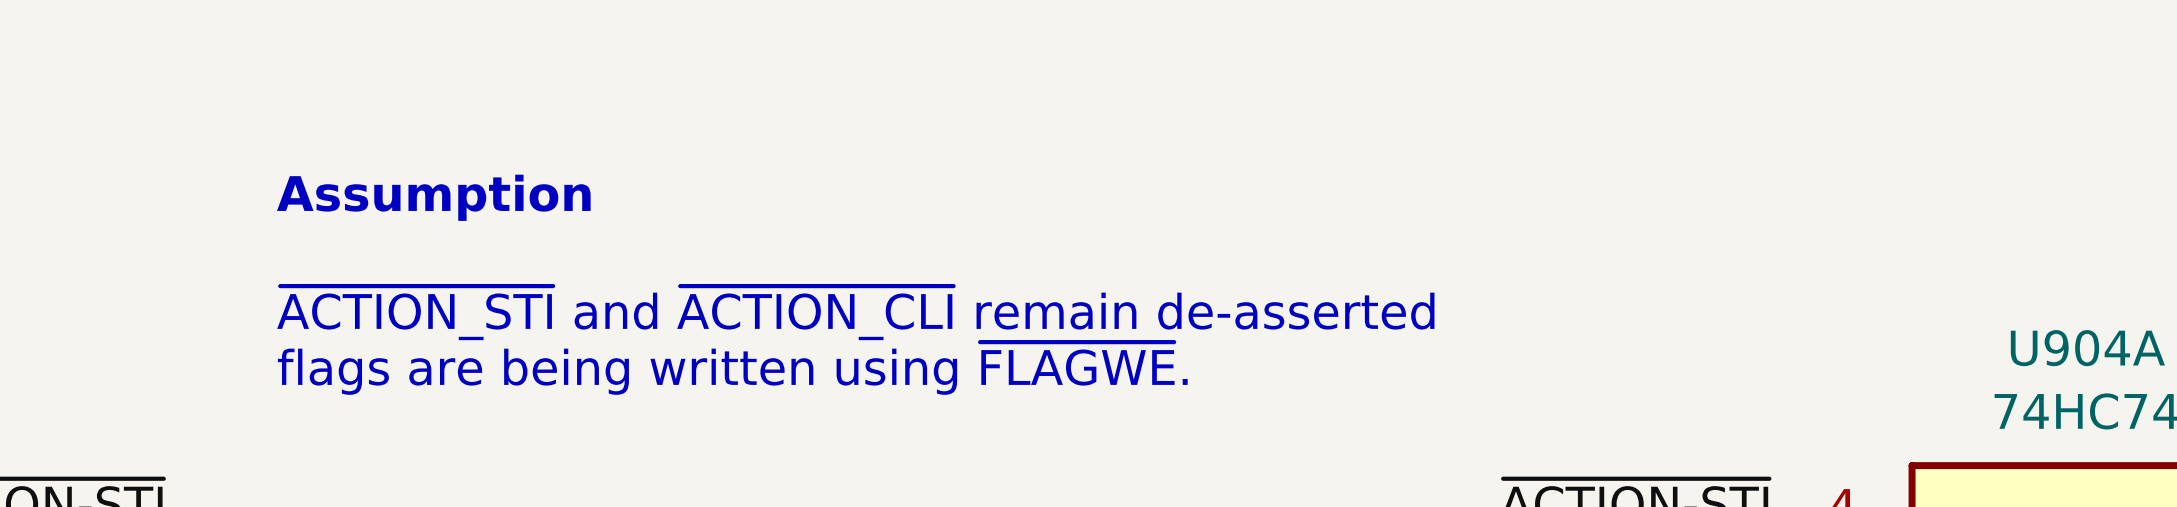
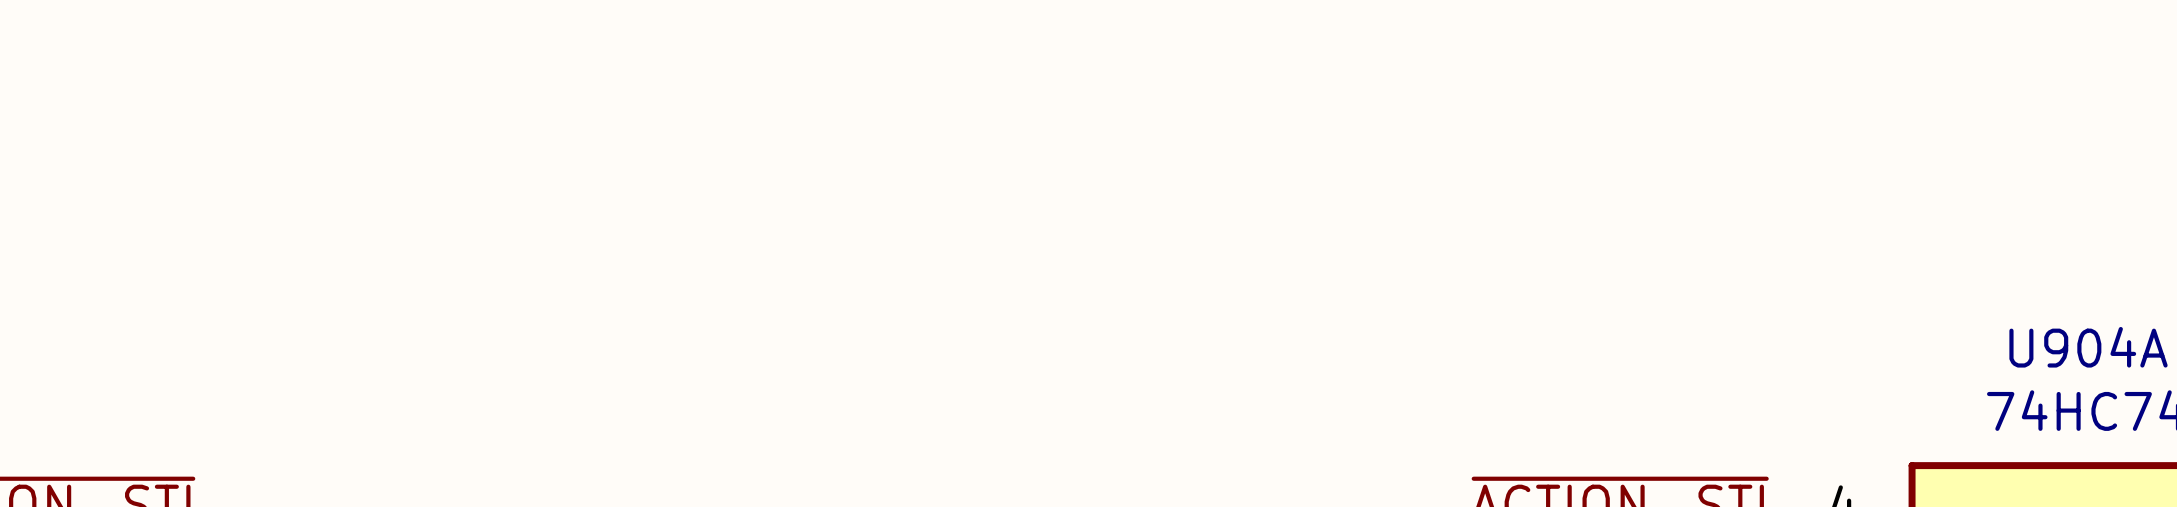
text: Assumption (433, 197) -> none
text: ~{ACTION_STI} and ~{ACTION_CLI} remain de-asserted (855, 313) -> none
text: flags are being written using ~{FLAGWE}. (732, 368) -> none

